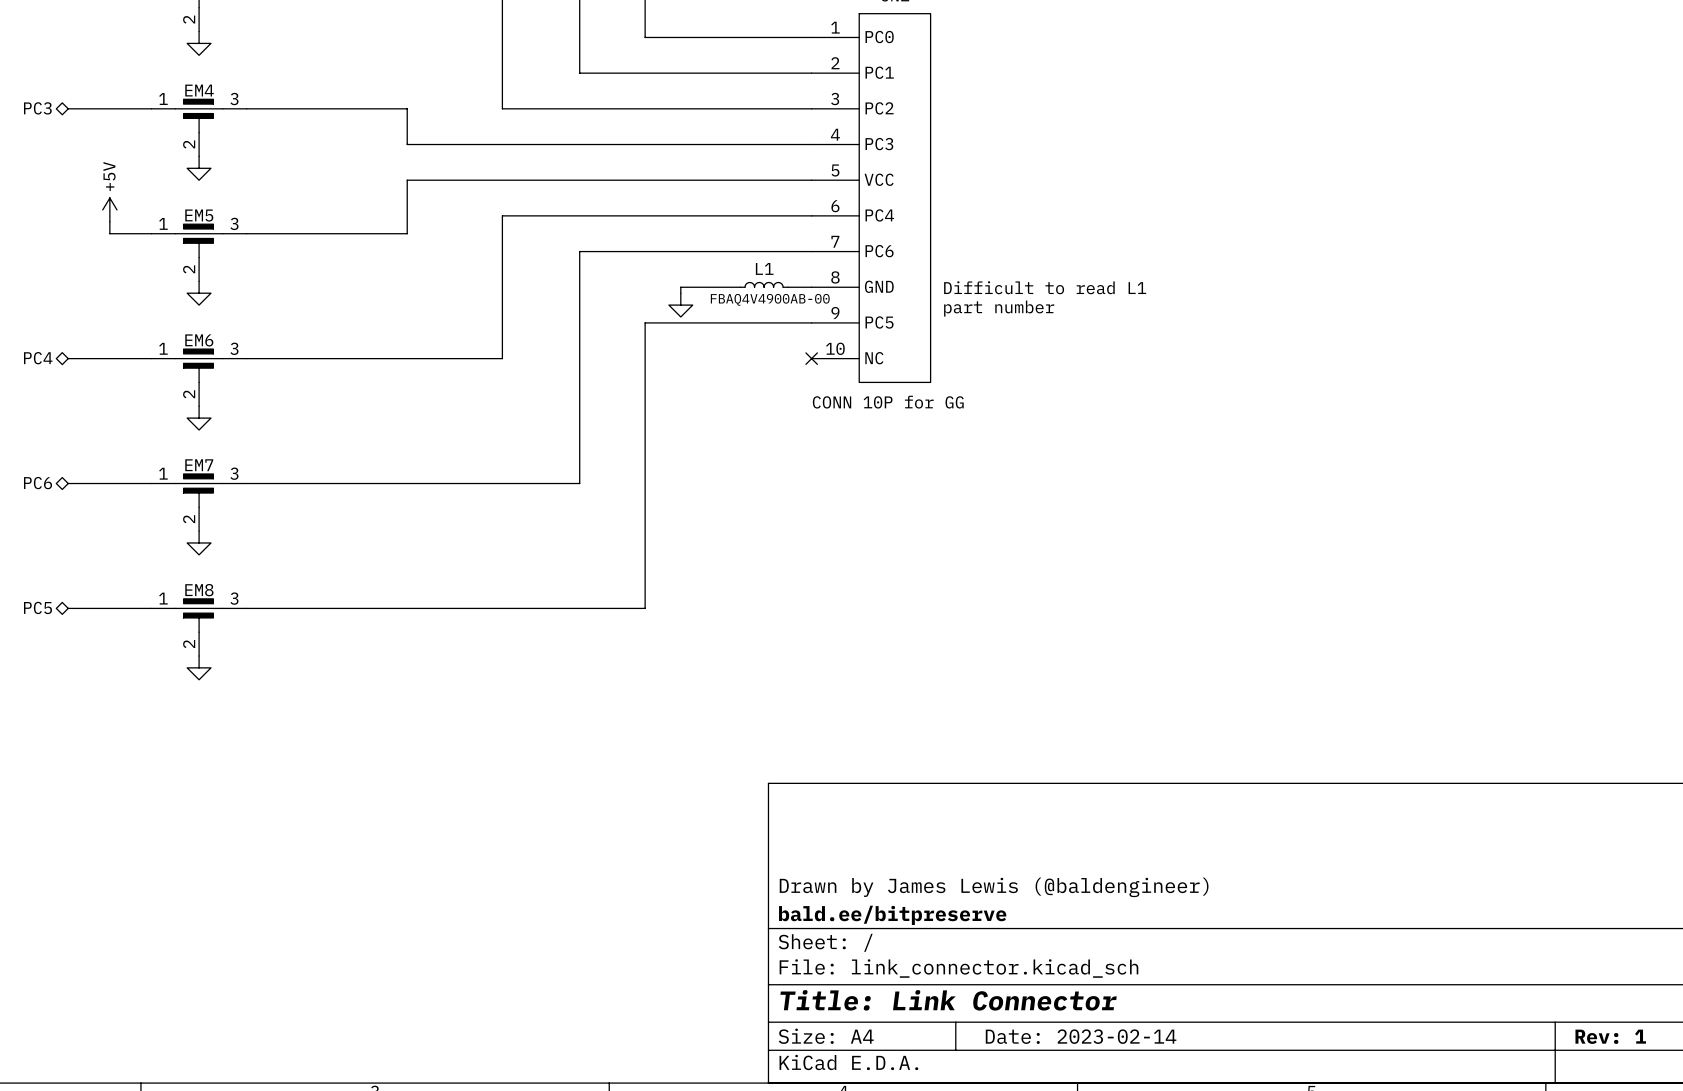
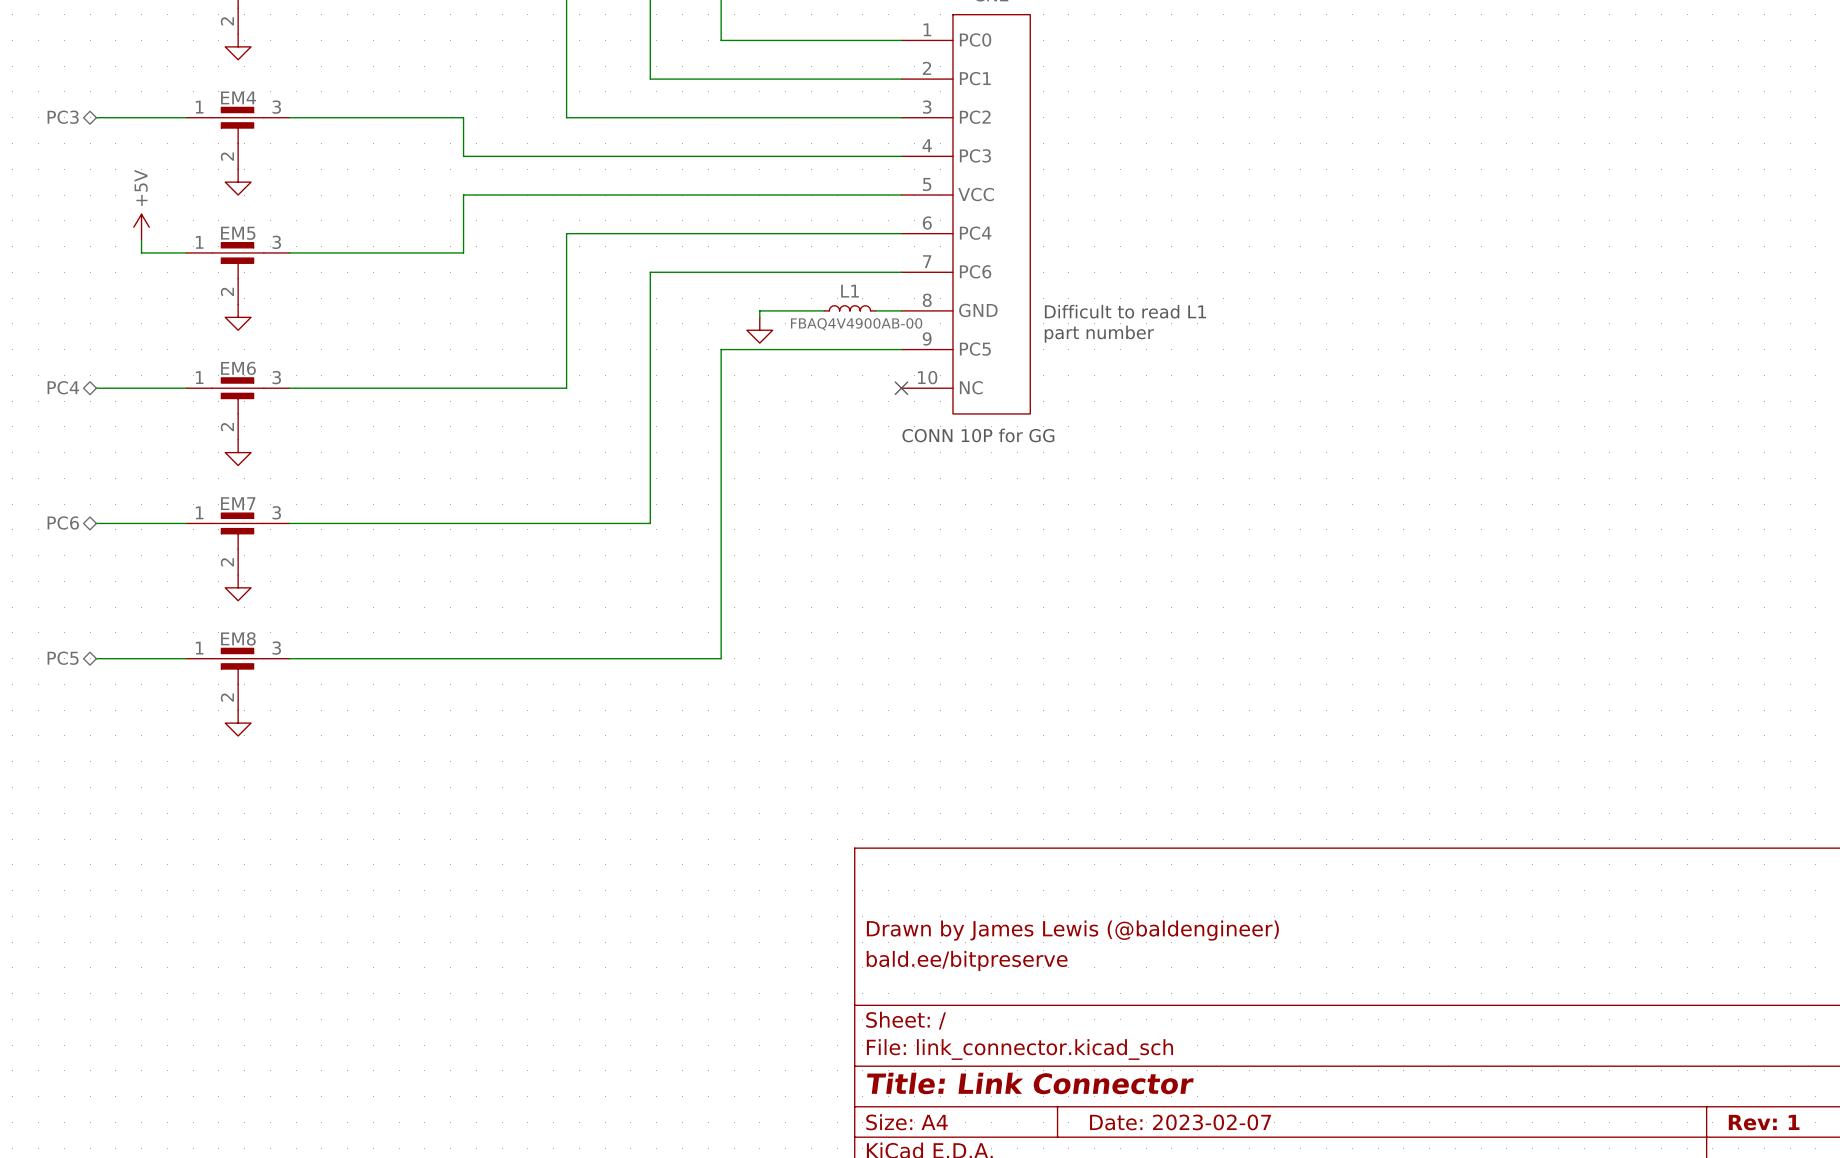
title block: none -> Drawn by James Lewis (@baldengineer) (1072, 930)
title block: Drawn by James Lewis (@baldengineer) (994, 887) -> bald.ee/bitpreserve (967, 960)
title block: bald.ee/bitpreserve (892, 915) -> none
title block: Date: 2023-02-14 (1081, 1036) -> Date: 2023-02-07 (1180, 1122)

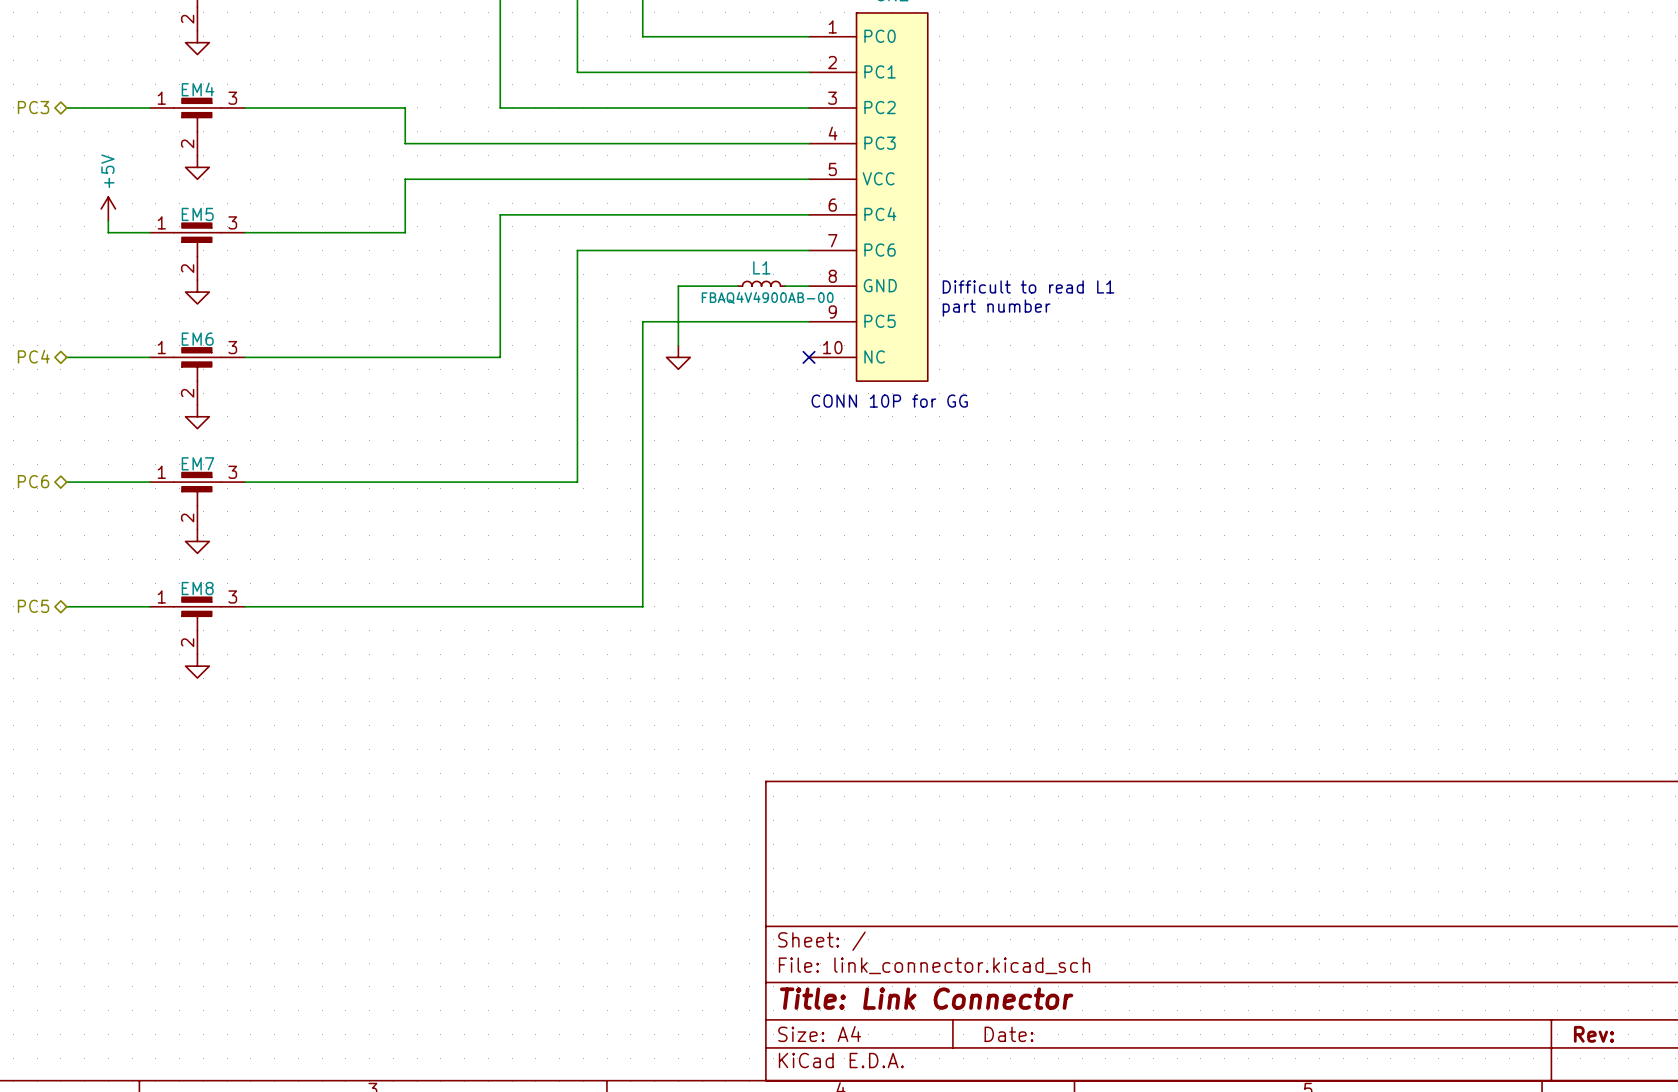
wire: none -> (678, 292) (678, 345)
power symbol position: (759, 330) -> (678, 357)
title block: Drawn by James Lewis (@baldengineer) (1072, 930) -> none
title block: bald.ee/bitpreserve (967, 960) -> none
title block: Date: 2023-02-07 (1180, 1122) -> Date: (1008, 1034)
title block: Rev: 1 (1764, 1122) -> Rev: (1593, 1034)

